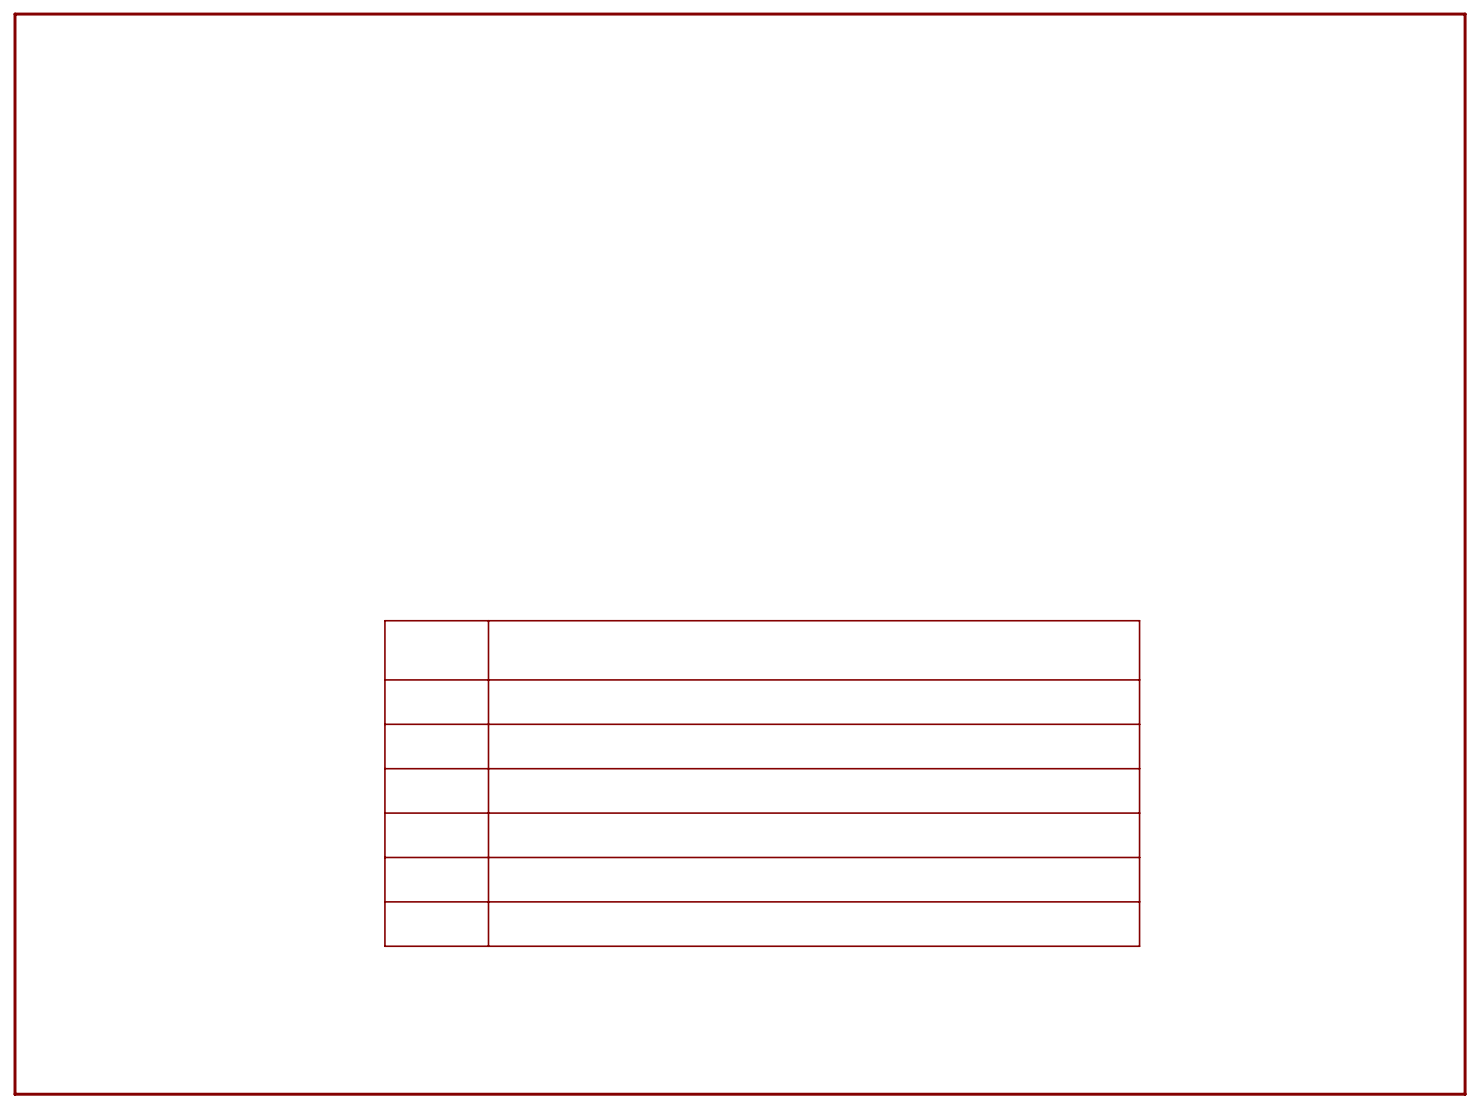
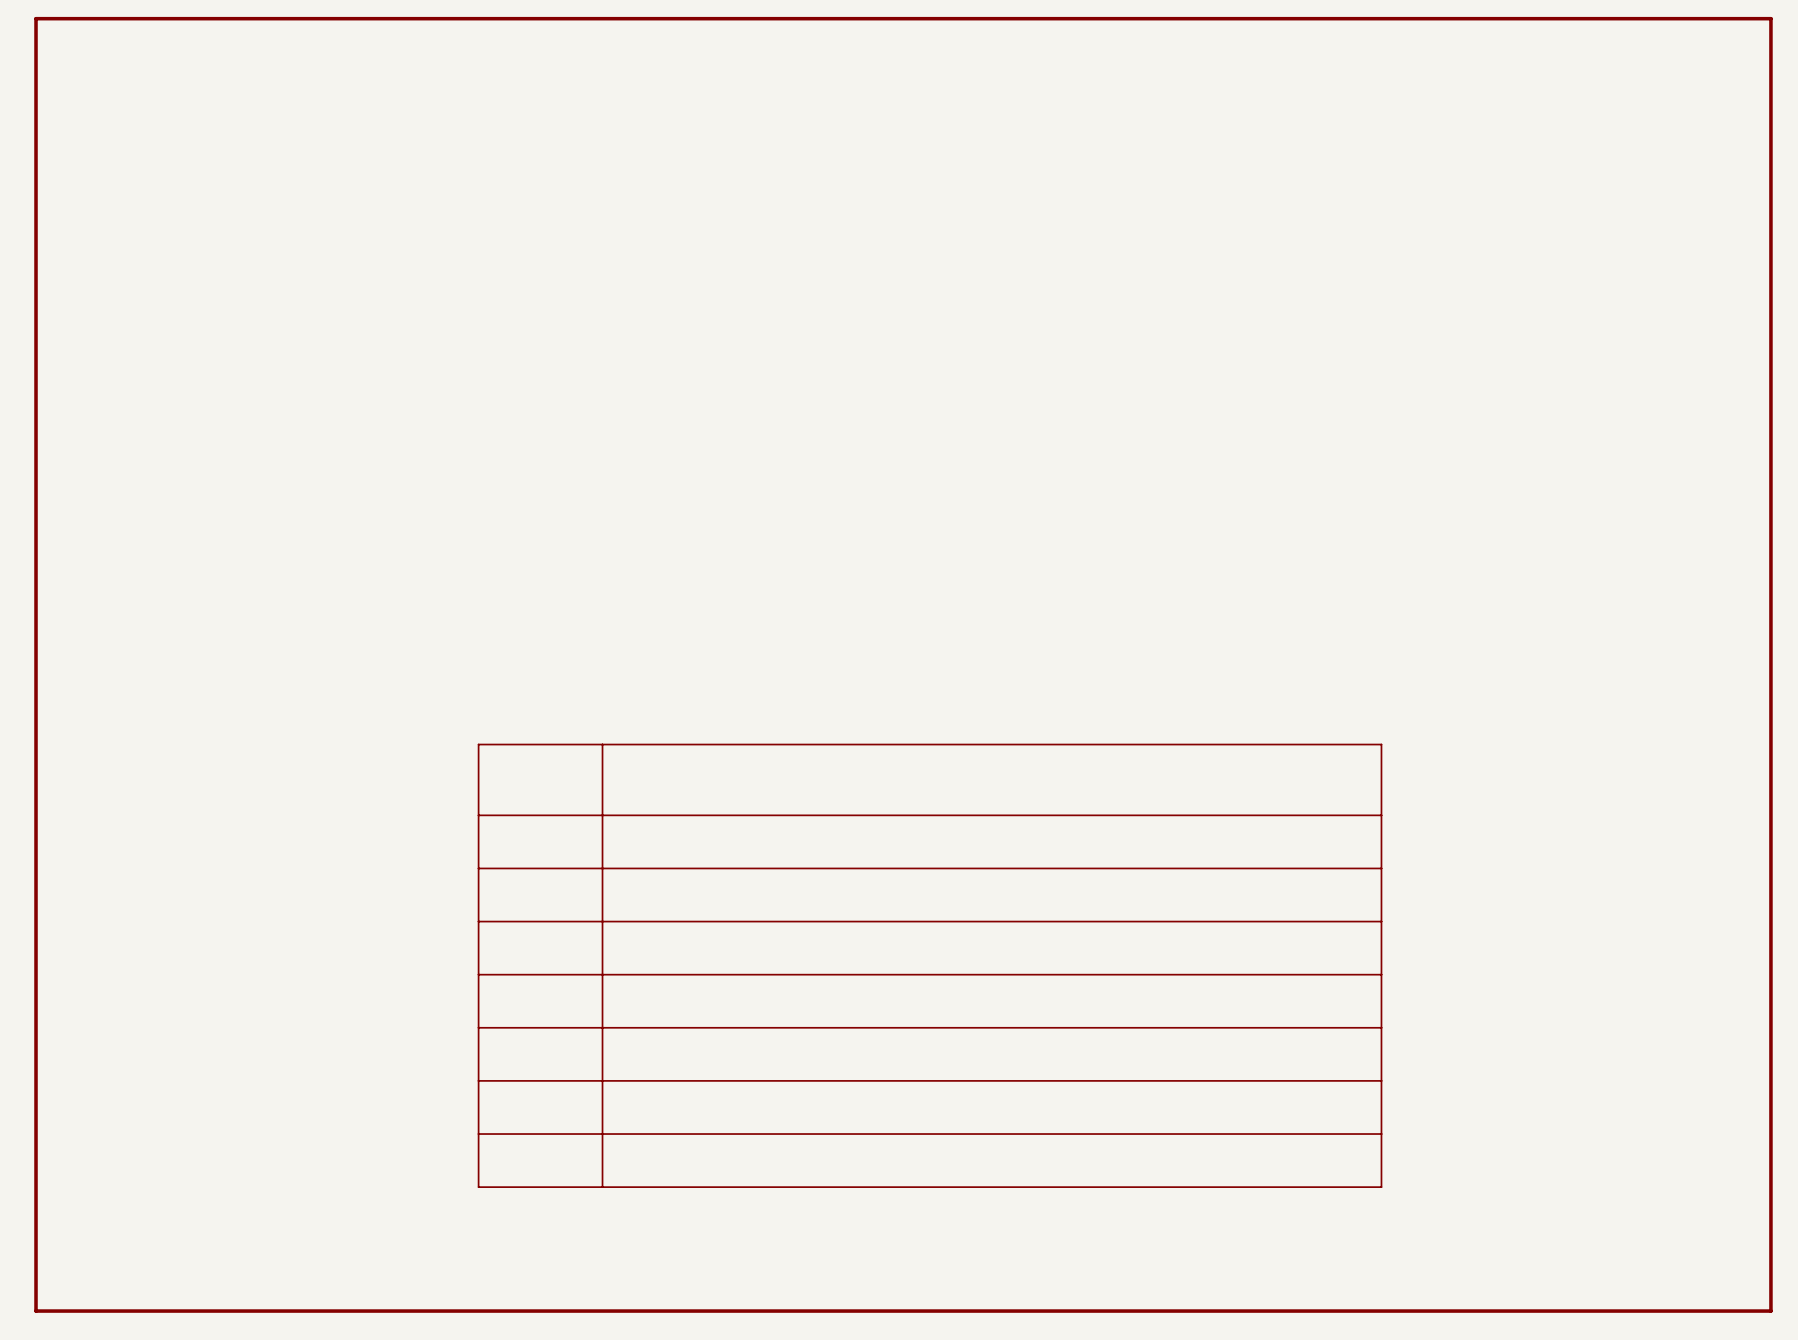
line: none -> (478, 1134) (478, 1187) (1381, 1187) (1381, 1134)
line: none -> (602, 1134) (602, 1187)

